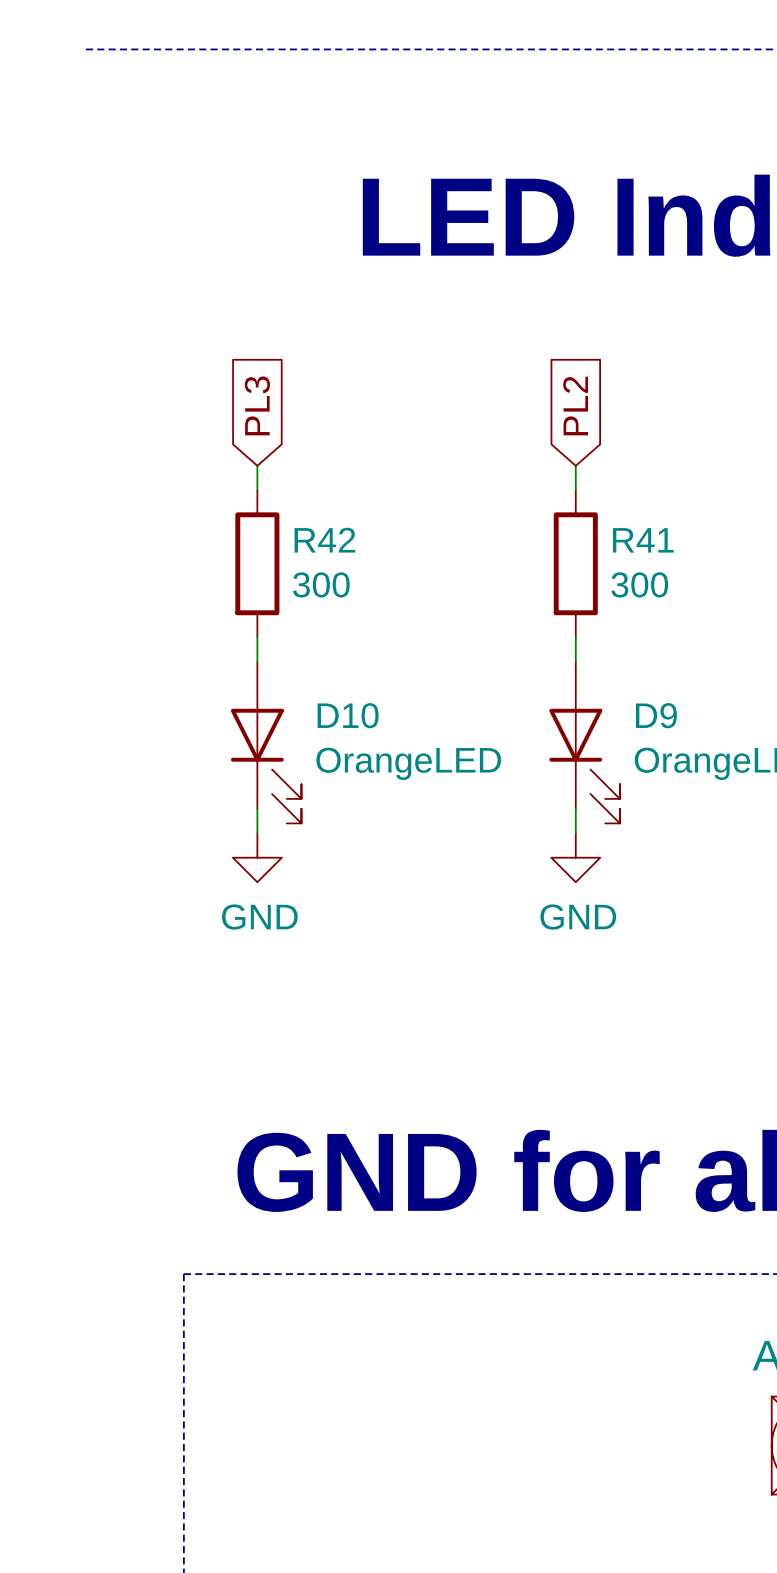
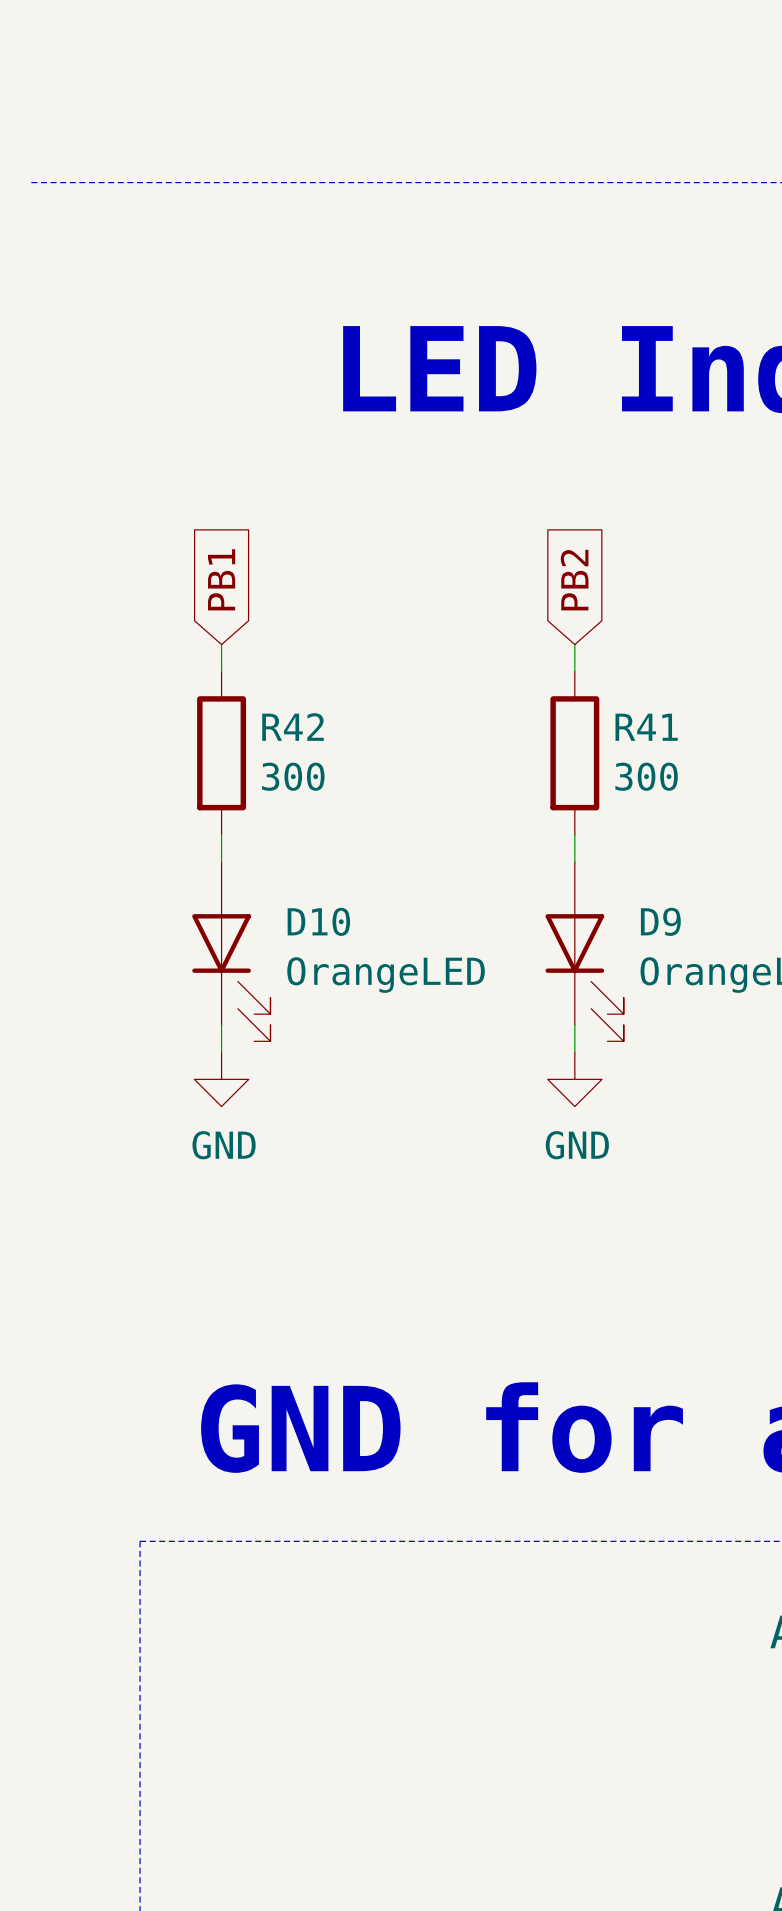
global label: PL3 (257, 405) -> PB1 (221, 579)
global label: PL2 (575, 406) -> PB2 (574, 580)

